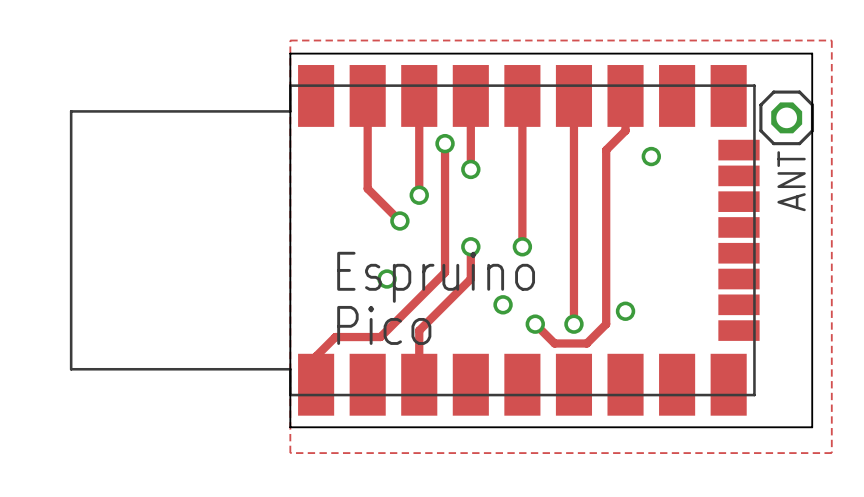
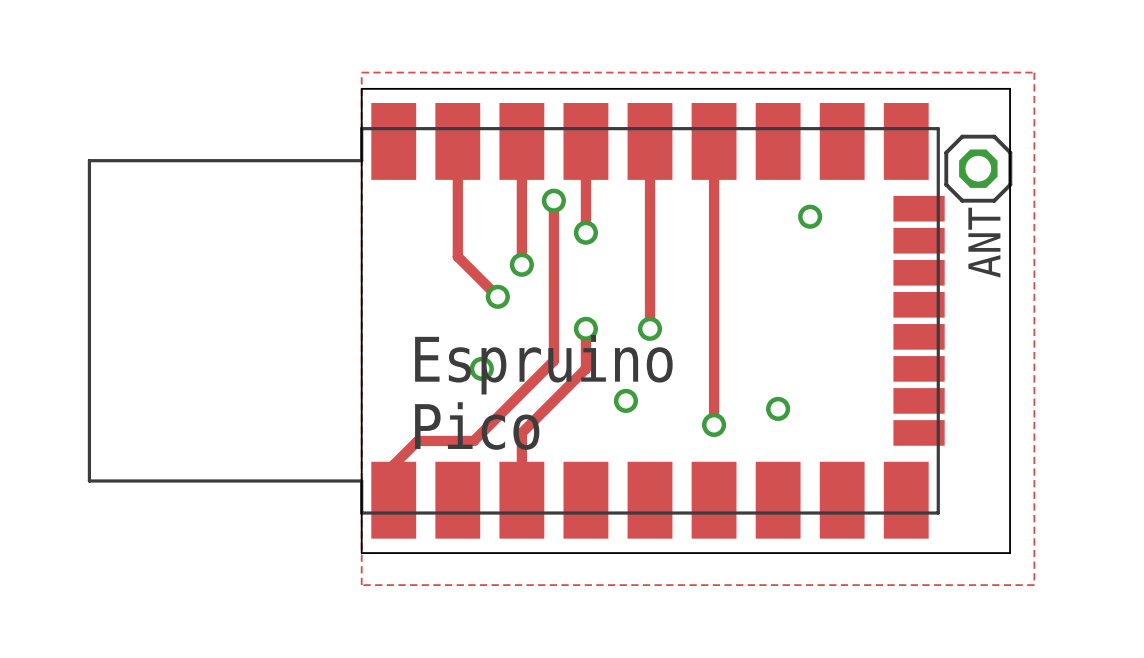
track: (625, 95) (625, 130) (606, 150) (606, 324) (586, 343) (554, 343) (535, 324) -> none
via: (535, 324) -> none

